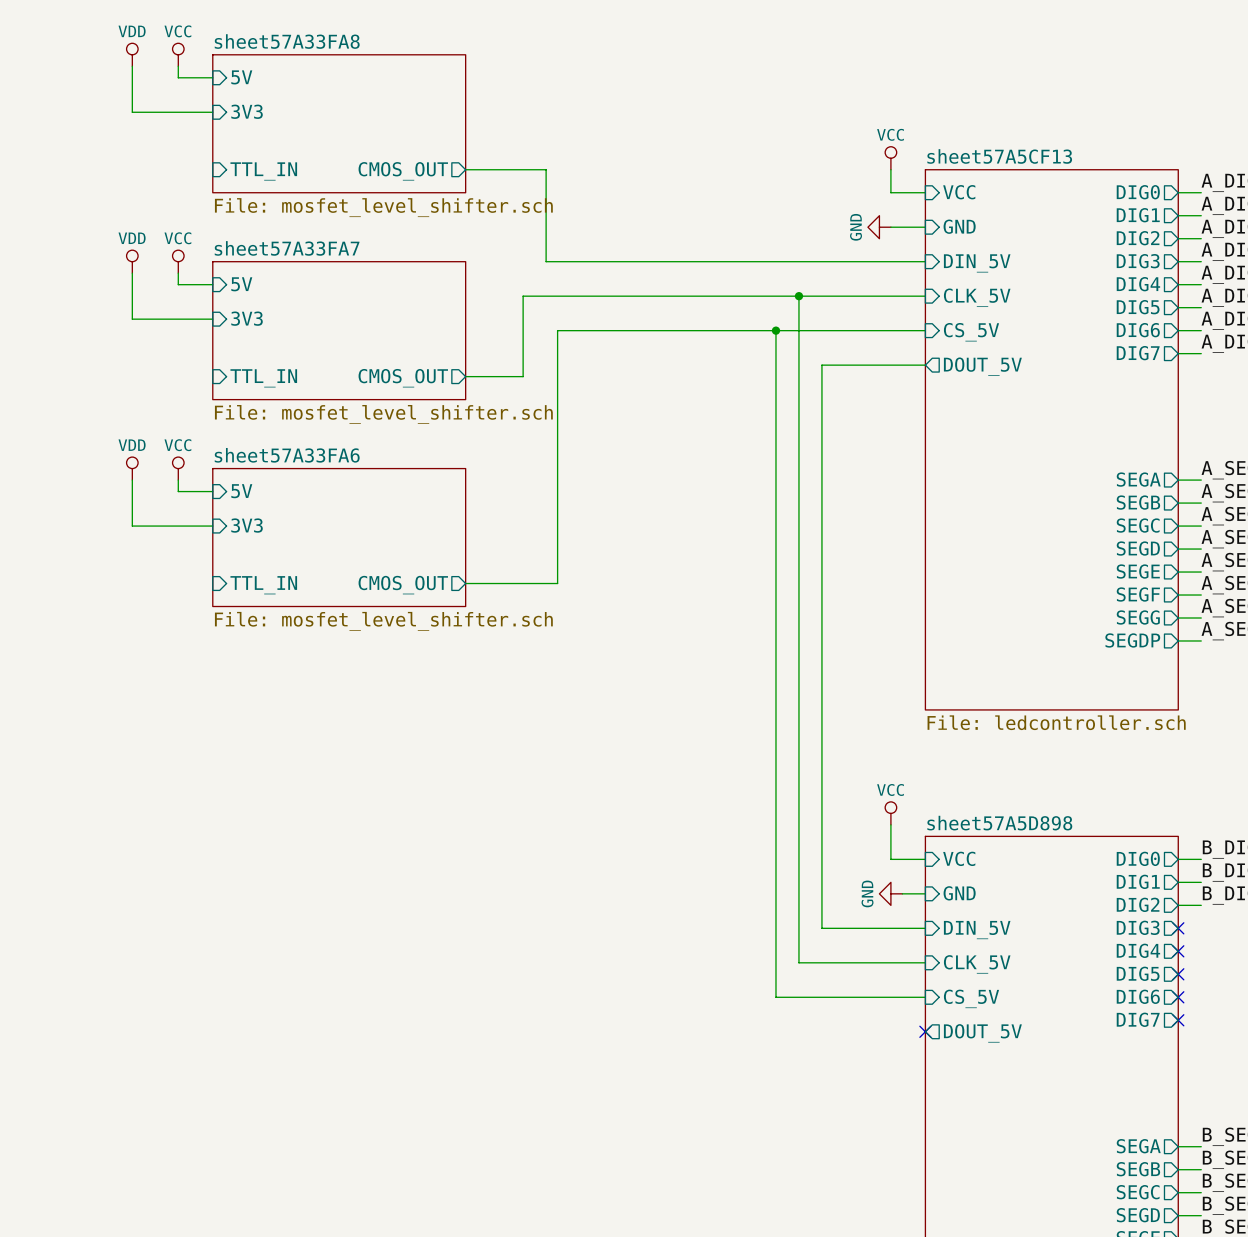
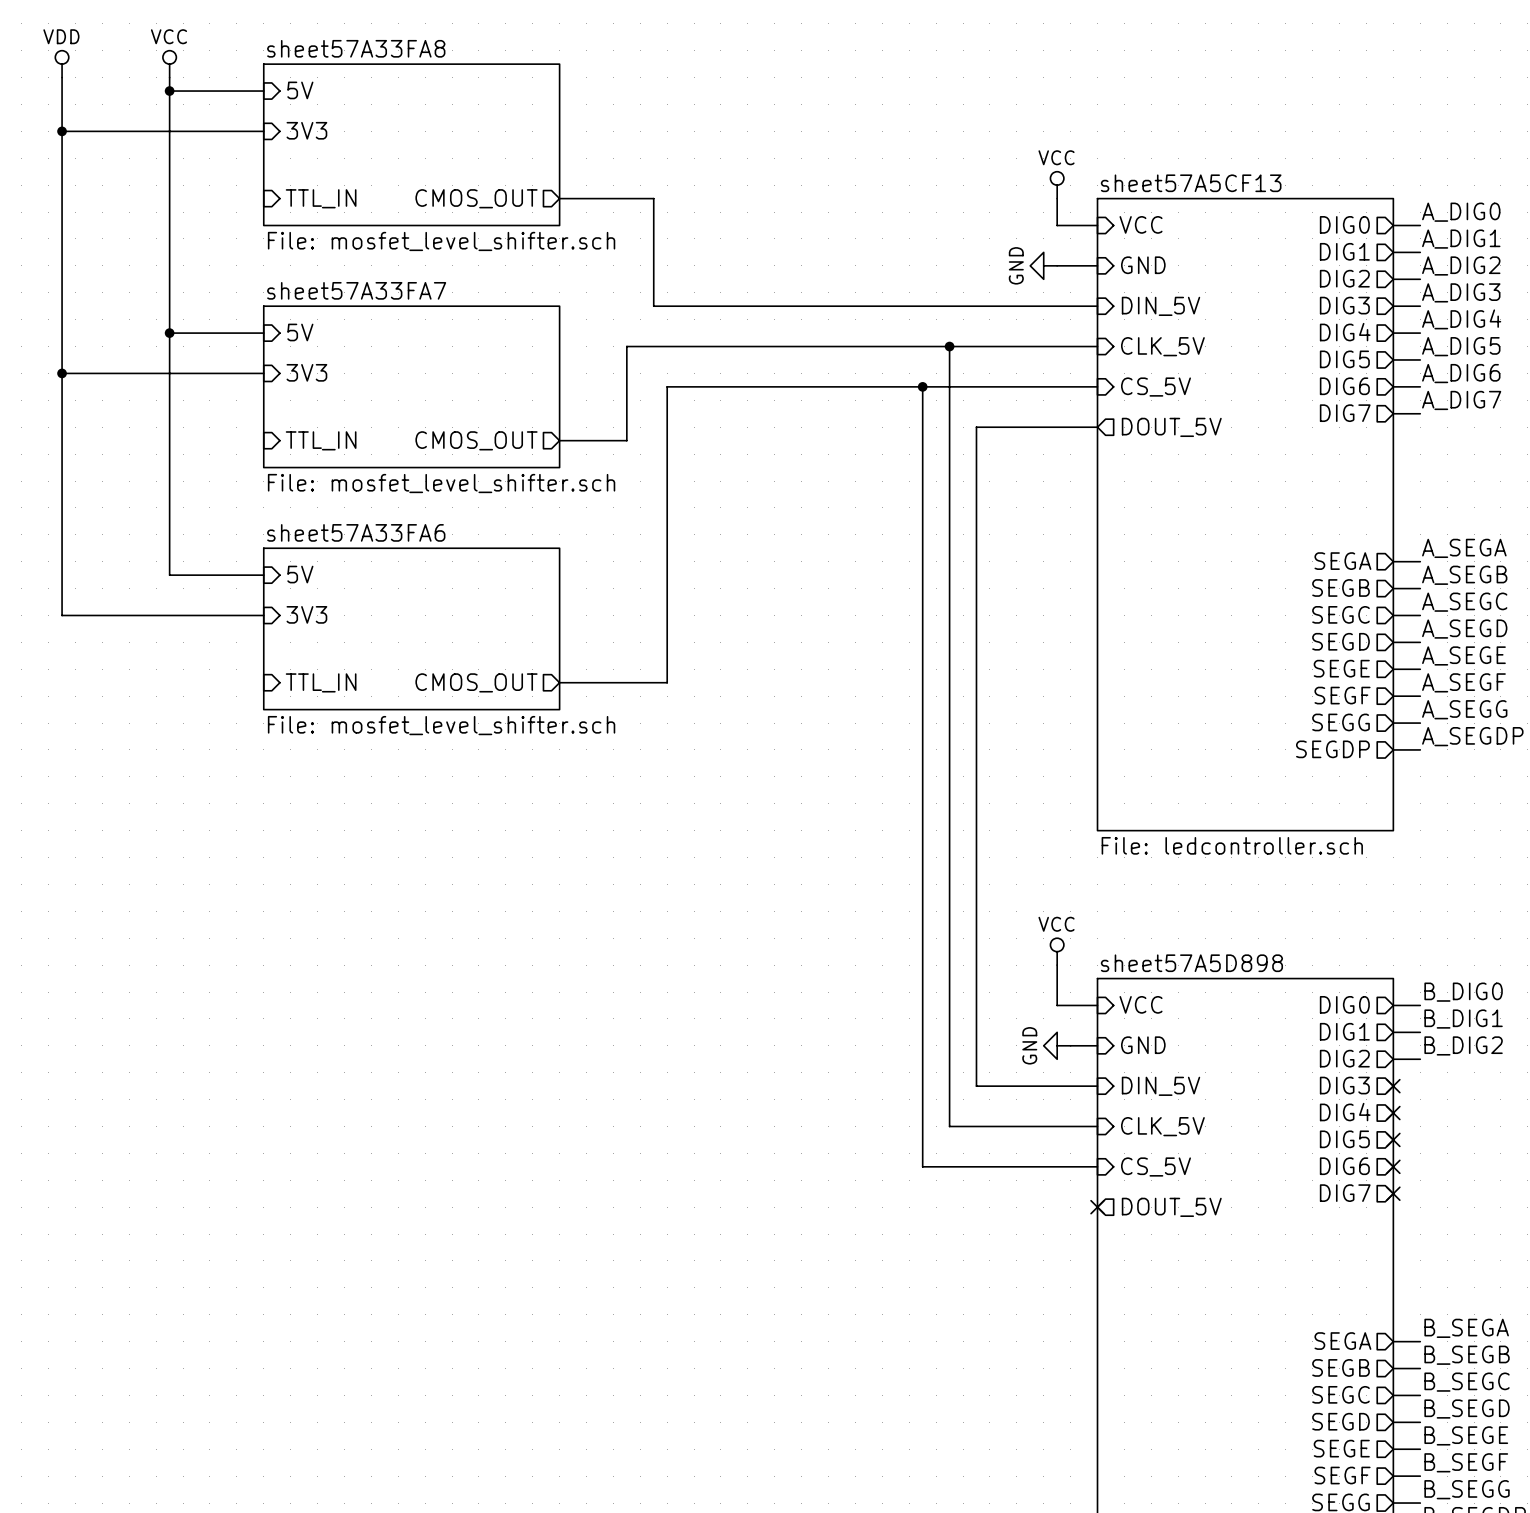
power symbol: none -> VDD (62, 64)
power symbol: VDD (132, 54) -> VCC (169, 64)
power symbol: VCC (178, 54) -> none
wire: (178, 66) (178, 77) -> (169, 91) (223, 91)
junction: none -> (169, 91)
wire: none -> (62, 131) (169, 131) (169, 319)
junction: none -> (62, 131)
power symbol: VDD (132, 261) -> none
power symbol: VCC (178, 261) -> none
wire: (178, 273) (178, 284) -> (169, 333) (223, 333)
junction: none -> (169, 333)
wire: none -> (62, 373) (169, 373) (169, 561)
junction: none -> (62, 373)
power symbol: VDD (132, 468) -> none
power symbol: VCC (178, 468) -> none
wire: (178, 480) (178, 491) -> (169, 575) (223, 575)
wire: (132, 491) (132, 526) -> (62, 77) (62, 615) (169, 615)

